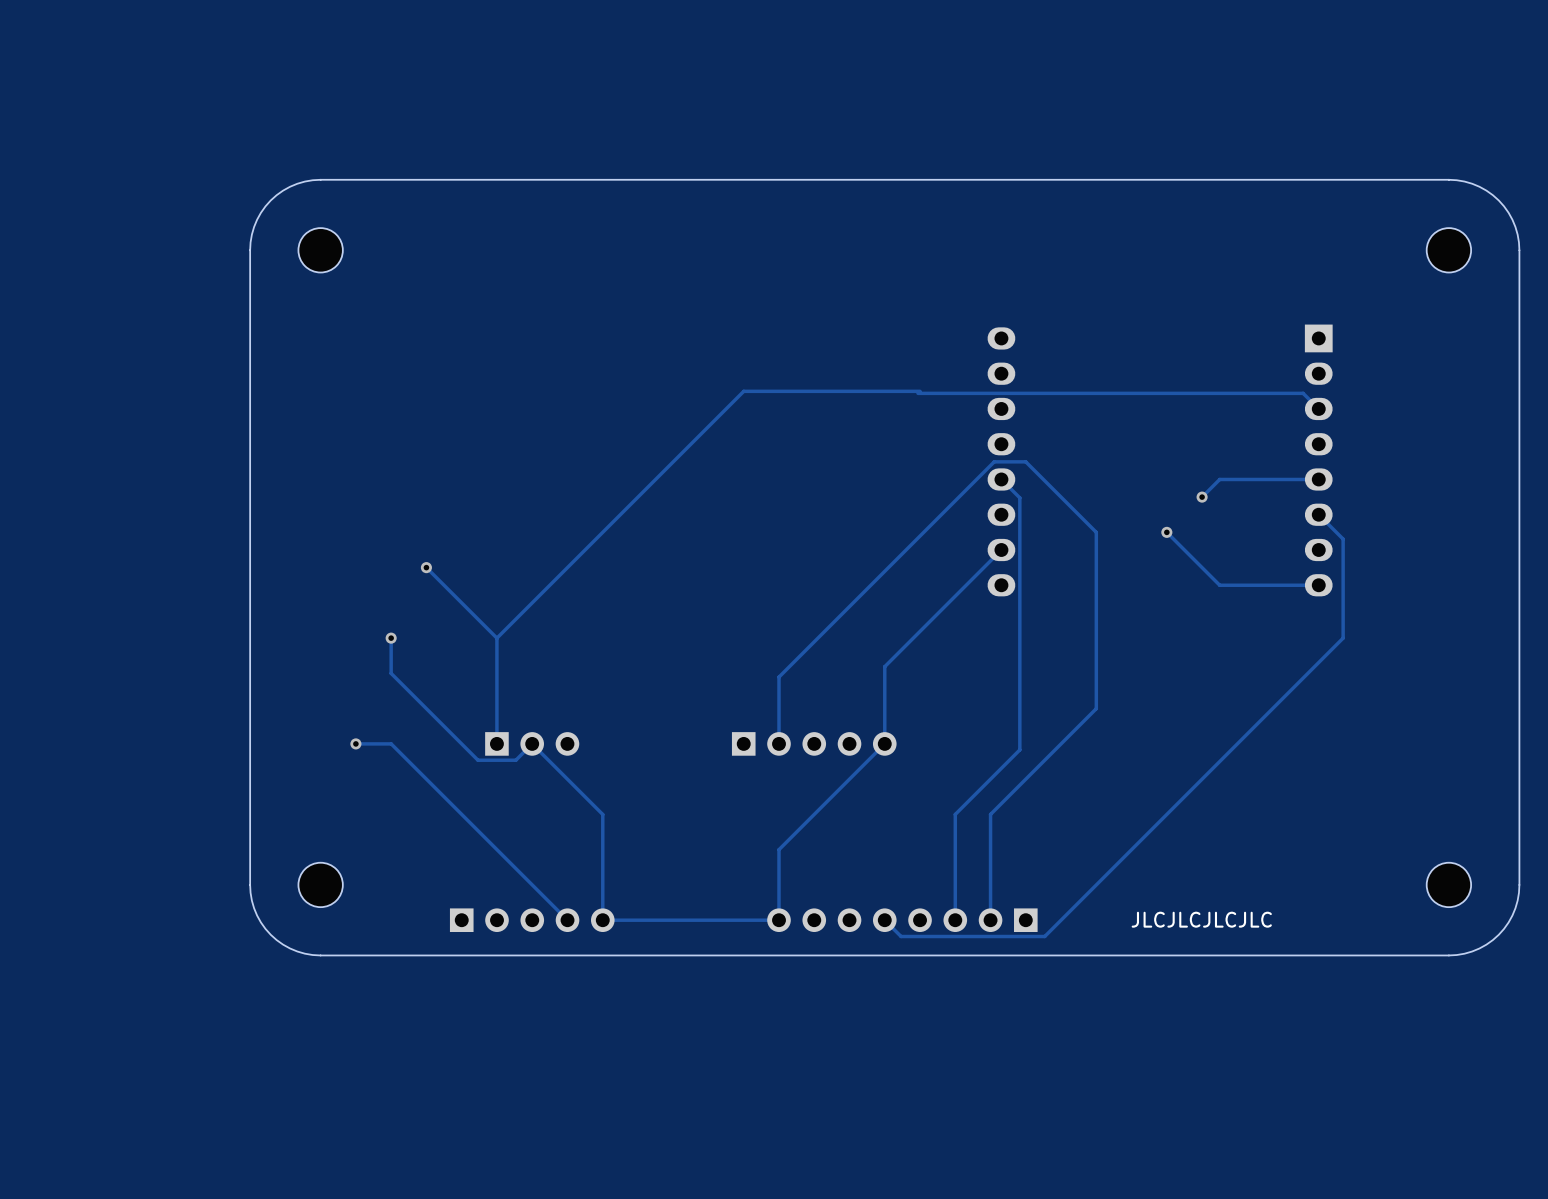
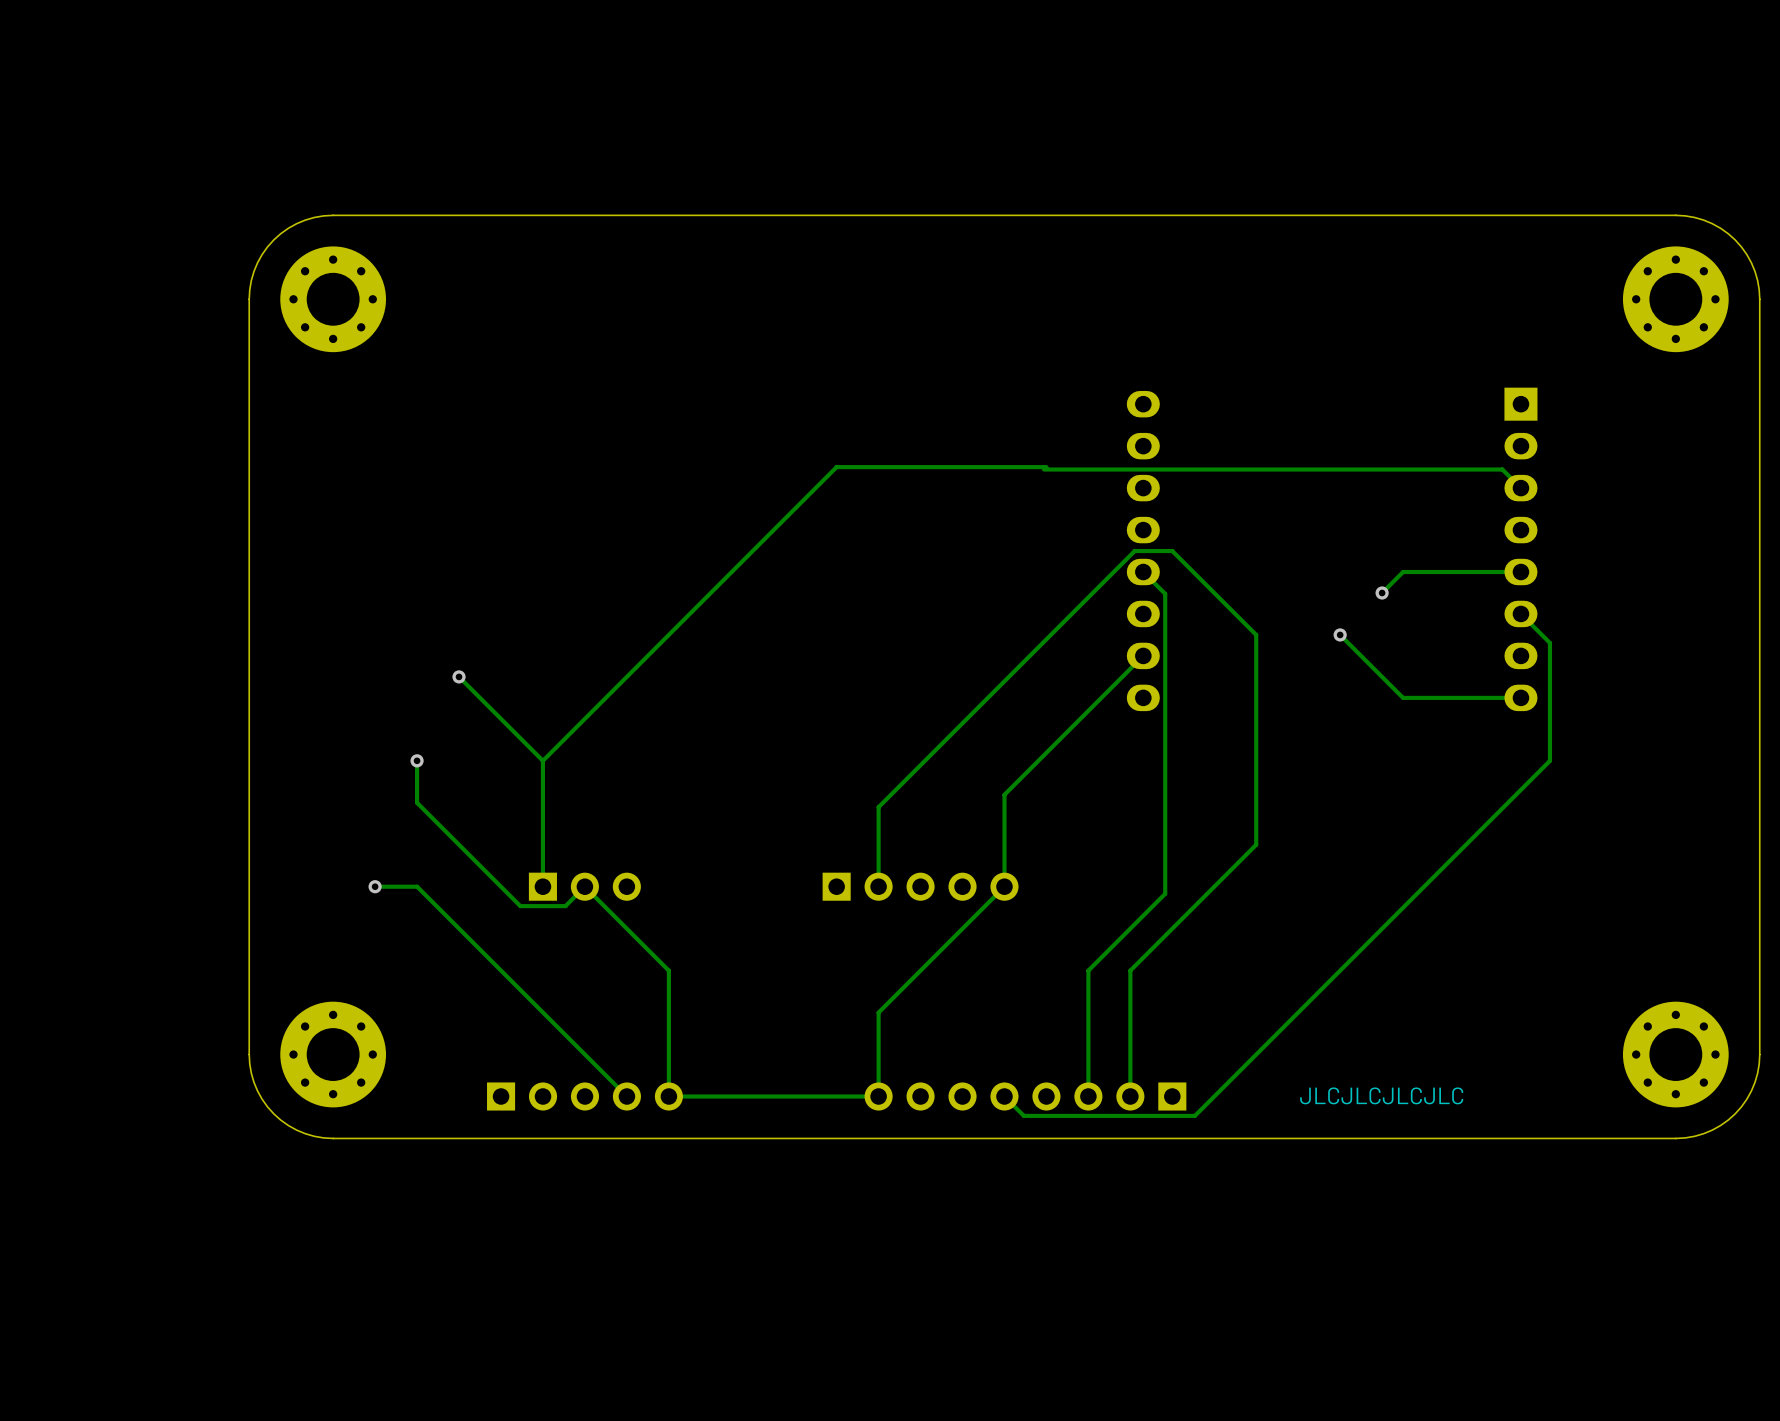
part footprint: [298, 228, 343, 273] -> [280, 246, 387, 353]
part footprint: [1426, 228, 1472, 273] -> [1622, 246, 1729, 353]
part footprint: [298, 862, 343, 908] -> [280, 1001, 387, 1108]
part footprint: [1426, 862, 1472, 908] -> [1622, 1001, 1729, 1108]

